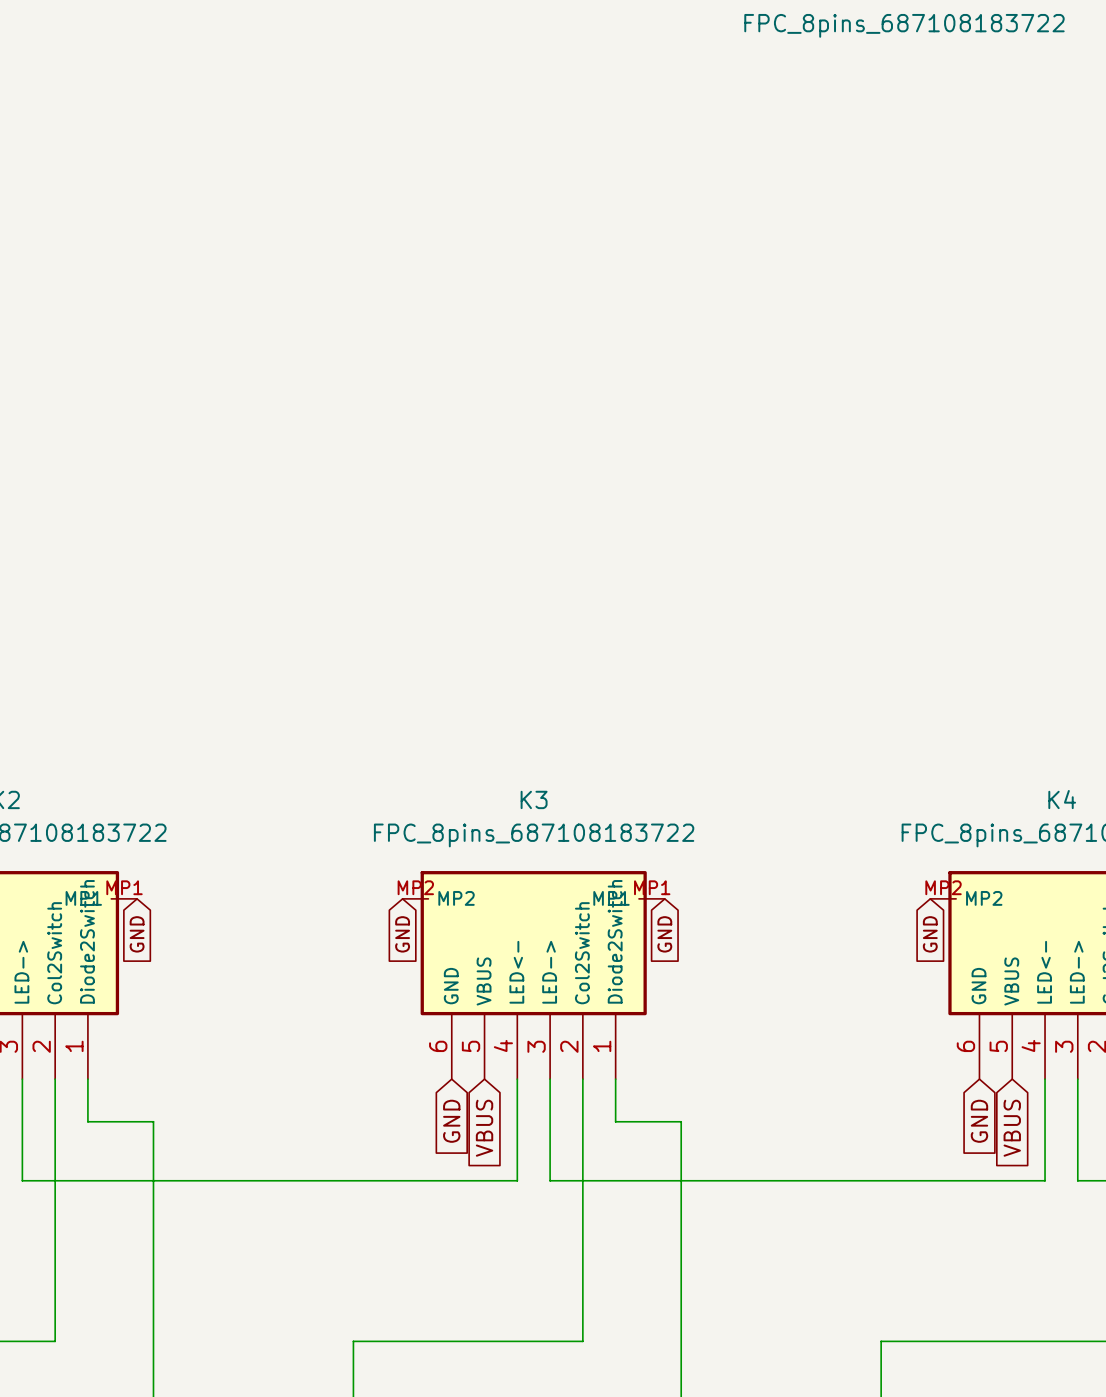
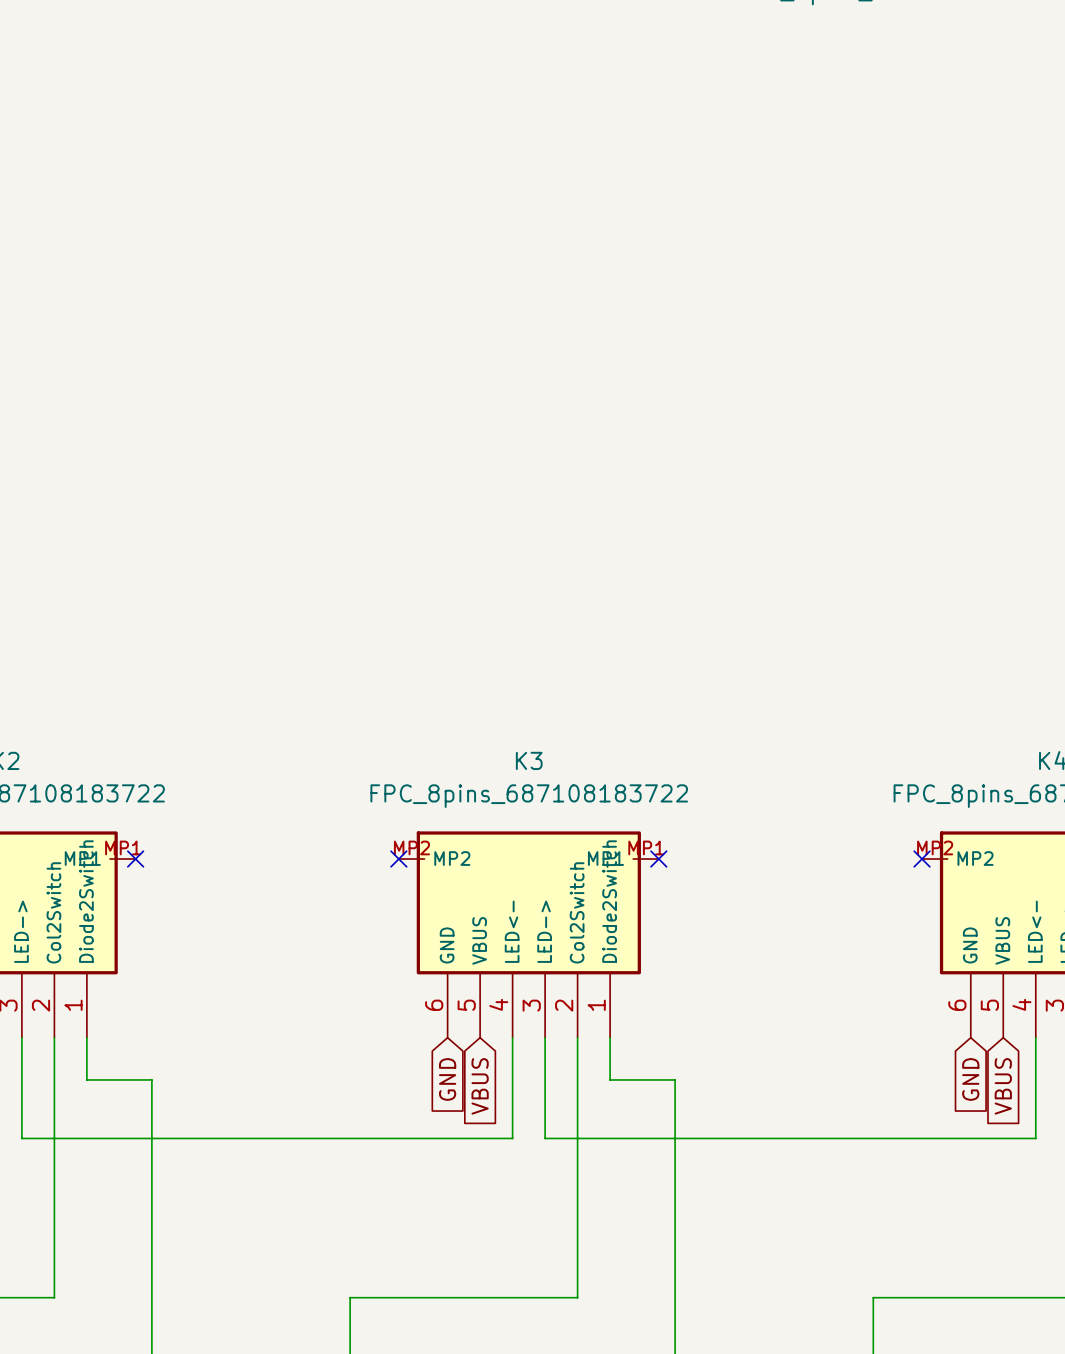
no-connect mark: none -> (135, 859)
no-connect mark: none -> (398, 859)
no-connect mark: none -> (658, 859)
no-connect mark: none -> (922, 859)
global label: GND (137, 934) -> none
global label: GND (402, 934) -> none
global label: GND (664, 934) -> none
global label: GND (930, 934) -> none

